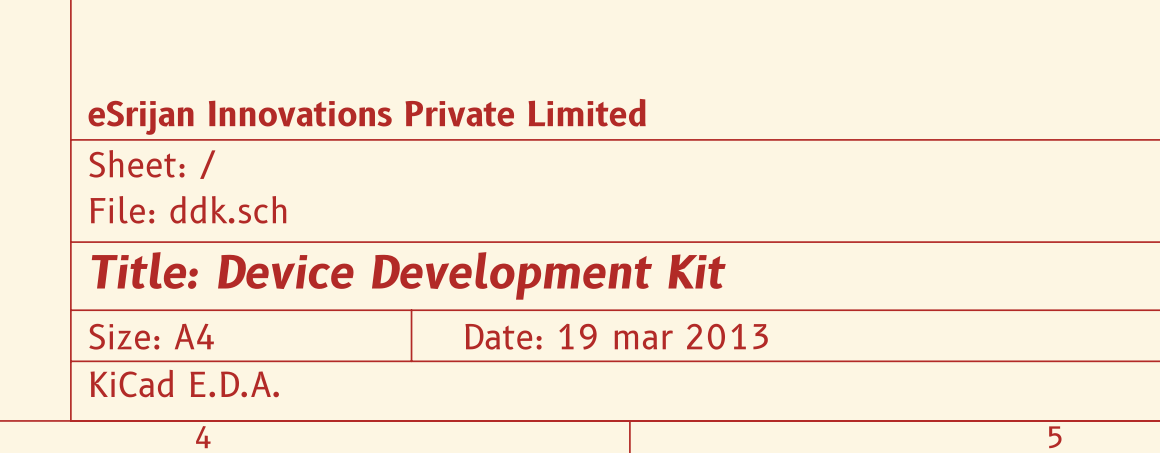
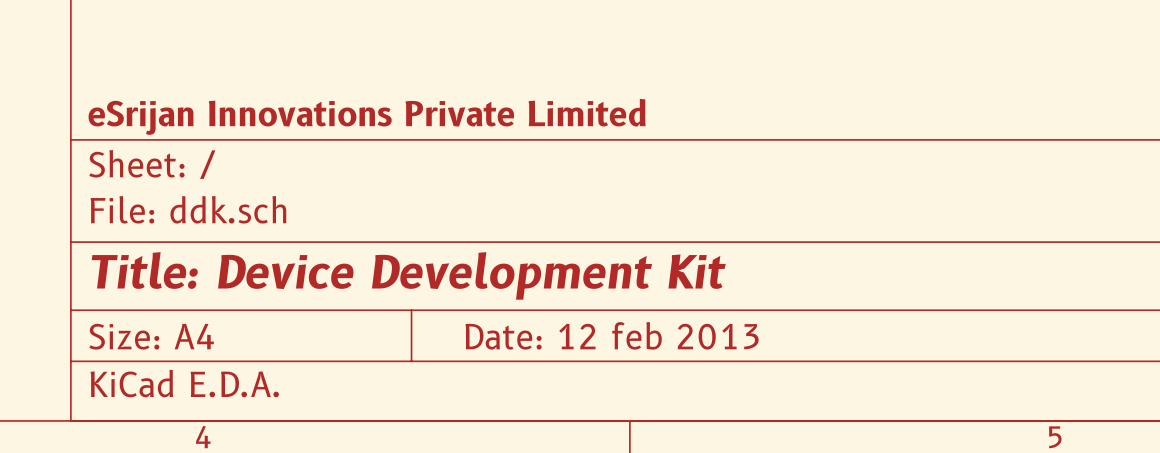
title block: Date: 19 mar 2013 (616, 336) -> Date: 12 feb 2013 (612, 335)

